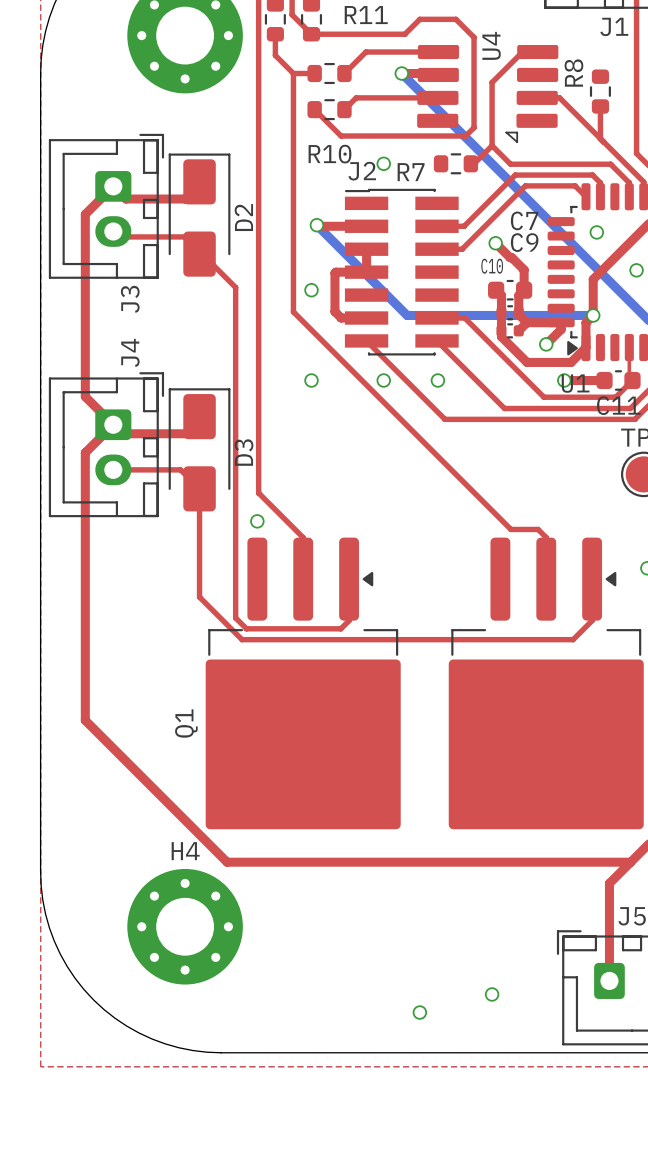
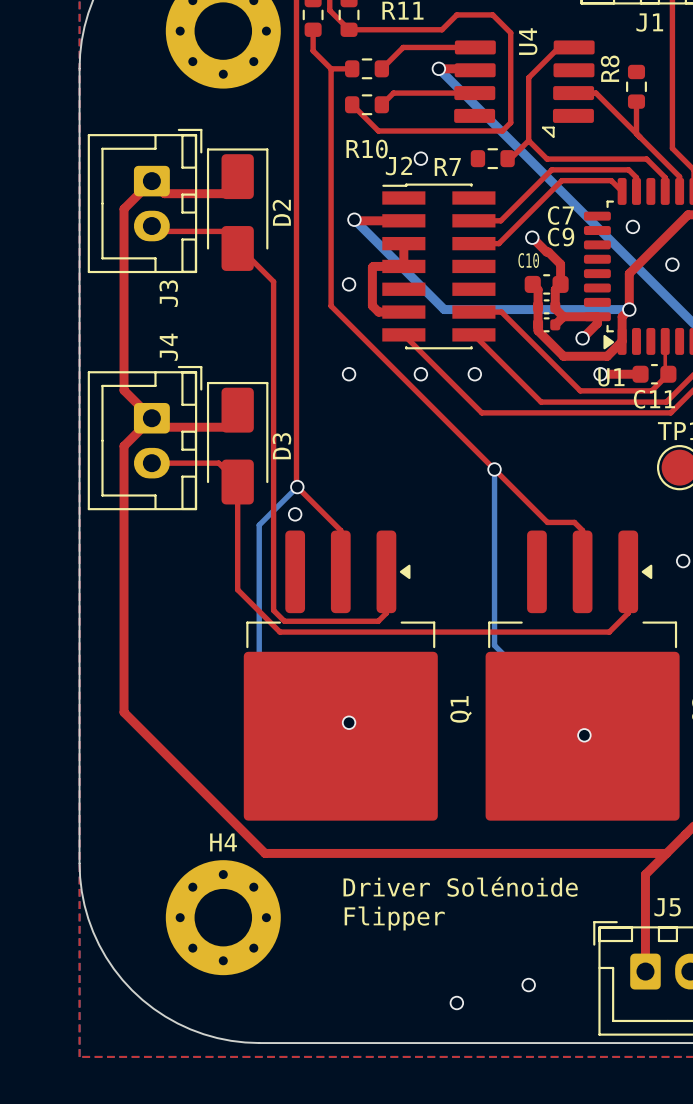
bottom track: none -> (494, 469) (494, 645) (586, 737)
via: none -> (494, 469)
bottom track: none -> (297, 487) (259, 525) (259, 683) (298, 722) (349, 722)
via: none -> (297, 487)
Q1 name position: Q1 (186, 723) -> Q1 (461, 709)
via: none -> (349, 722)
via: none -> (584, 735)
text: none -> Driver Solénoide (460, 886)
text: none -> Flipper (394, 918)

